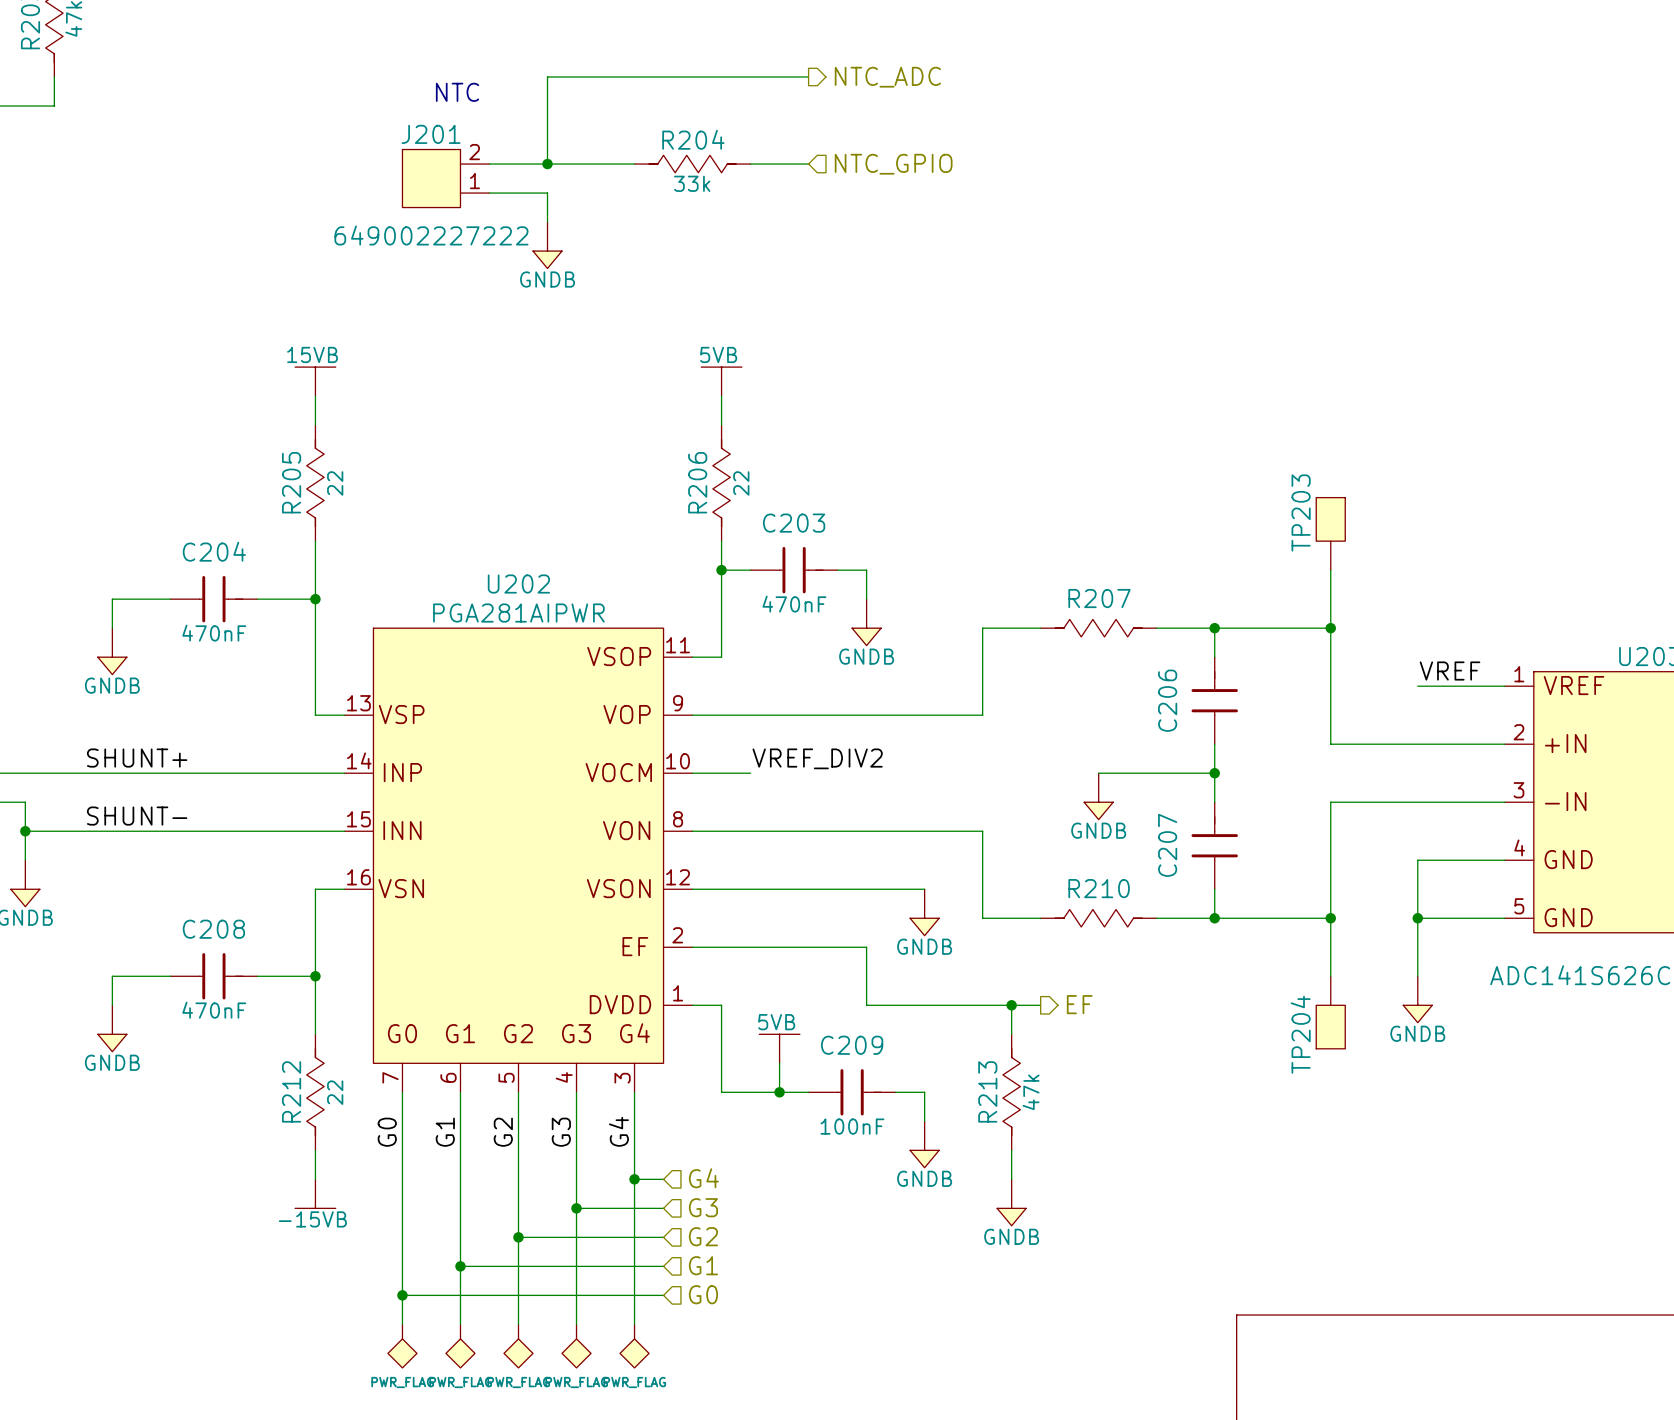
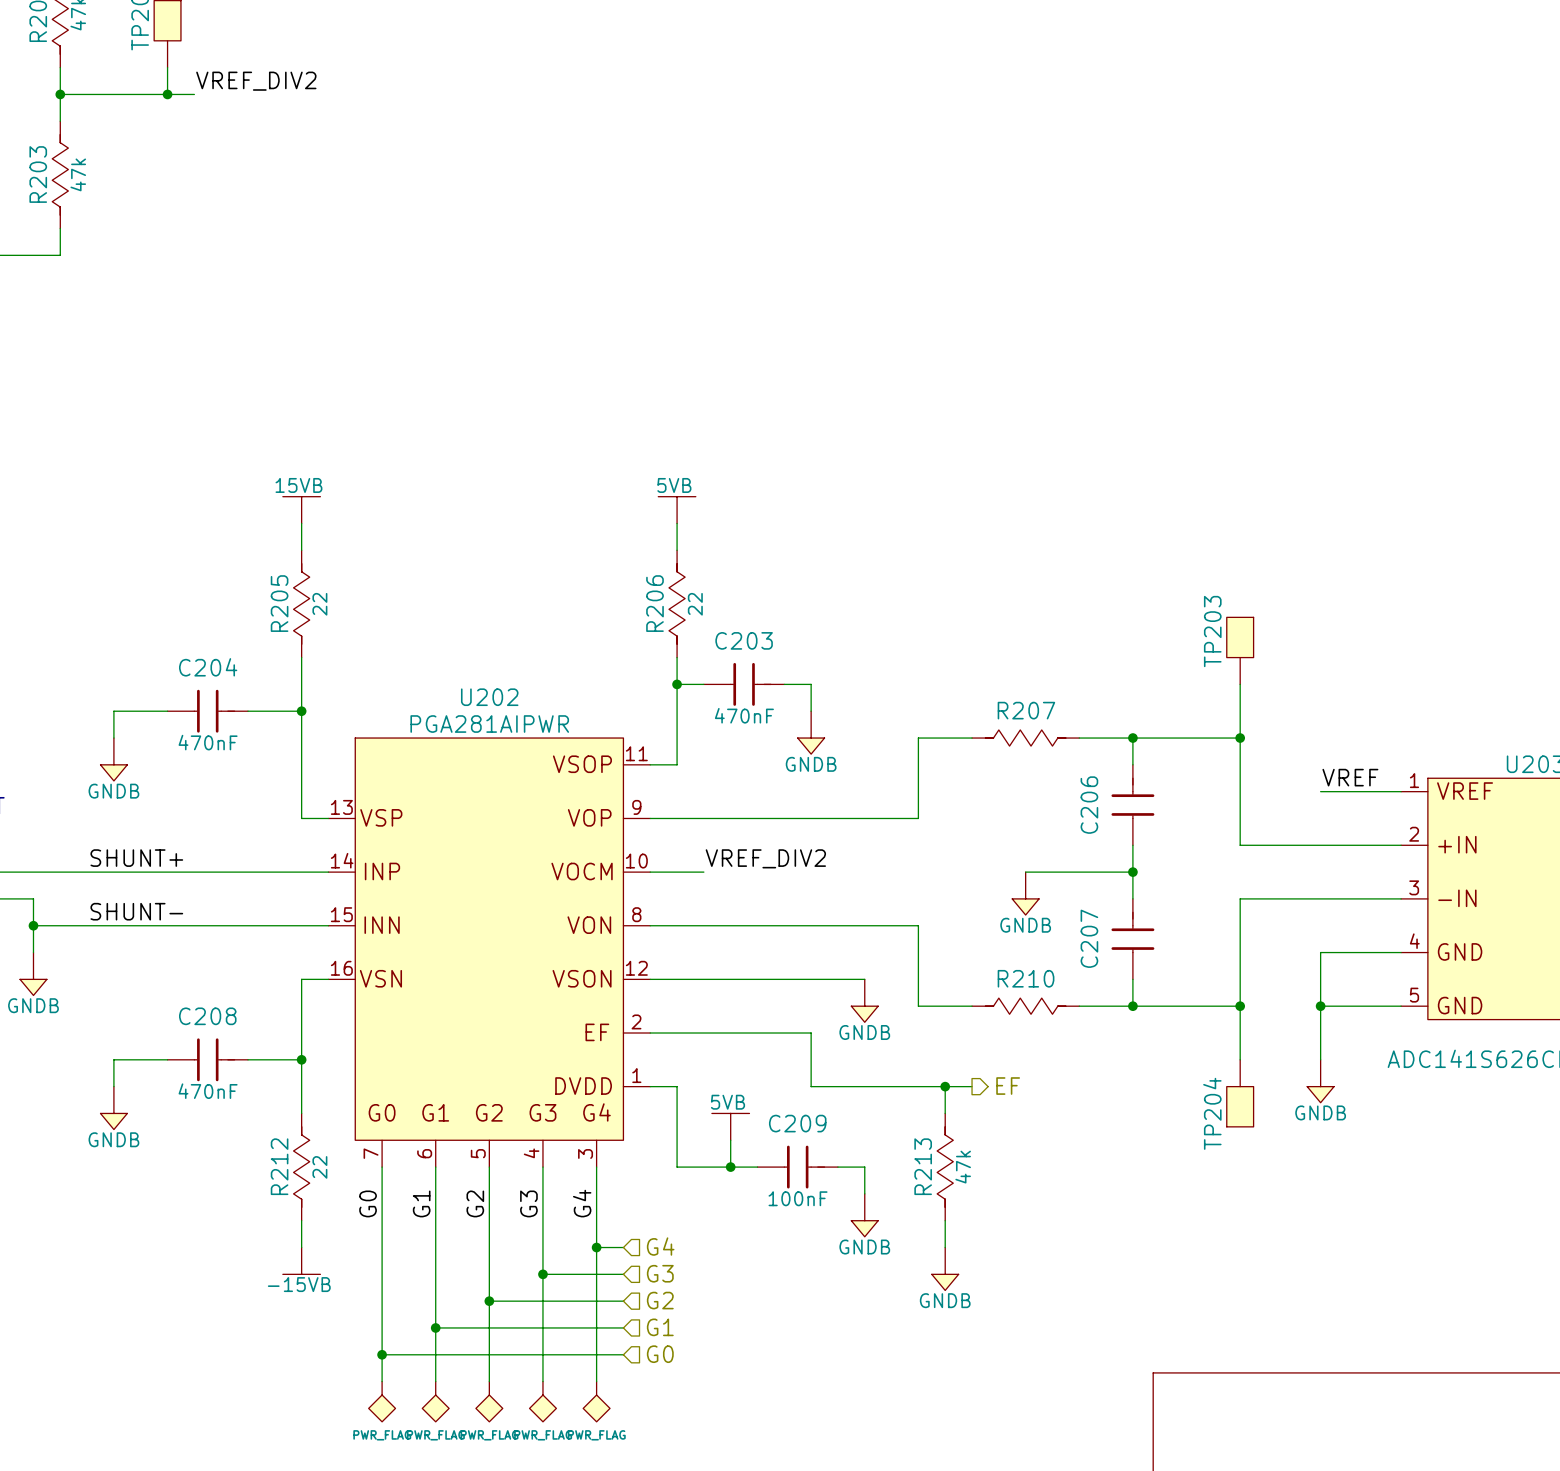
wire: (808, 77) (547, 77) (547, 164) -> none
hierarchical label: NTC_ADC (887, 77) -> none
text: NTC (457, 92) -> none
wire: (489, 164) (634, 164) -> none
junction: (547, 164) -> none
R204: (692, 164) -> none
wire: (750, 164) (808, 164) -> none
hierarchical label: NTC_GPIO (893, 164) -> none
J201: 649002227222 (445, 178) -> none
wire: (489, 193) (547, 193) (547, 222) -> none
power symbol: GNDB (547, 245) -> none

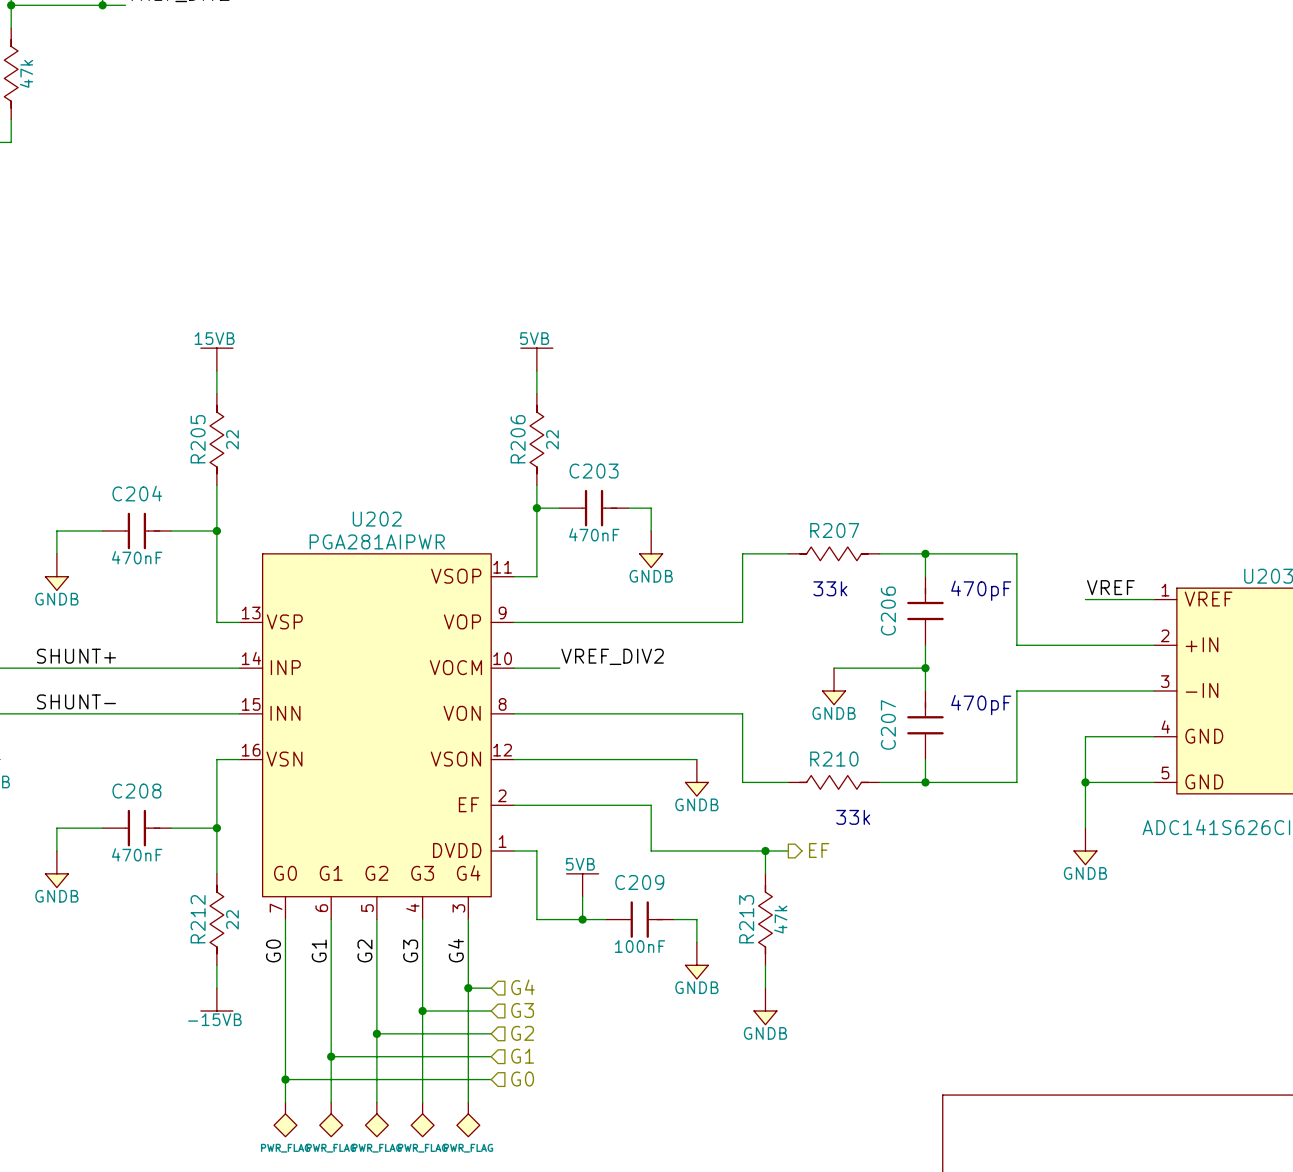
TP203: (1240, 650) -> none
wire: (1240, 684) (1240, 738) -> none
junction: (1240, 738) -> none
text: none -> 33k (830, 588)
text: none -> 470pF (981, 590)
text: none -> 470pF (981, 705)
wire: (1240, 1006) (1240, 1059) -> none
junction: (1240, 1006) -> none
text: none -> 33k (853, 817)
TP204: (1240, 1093) -> none

